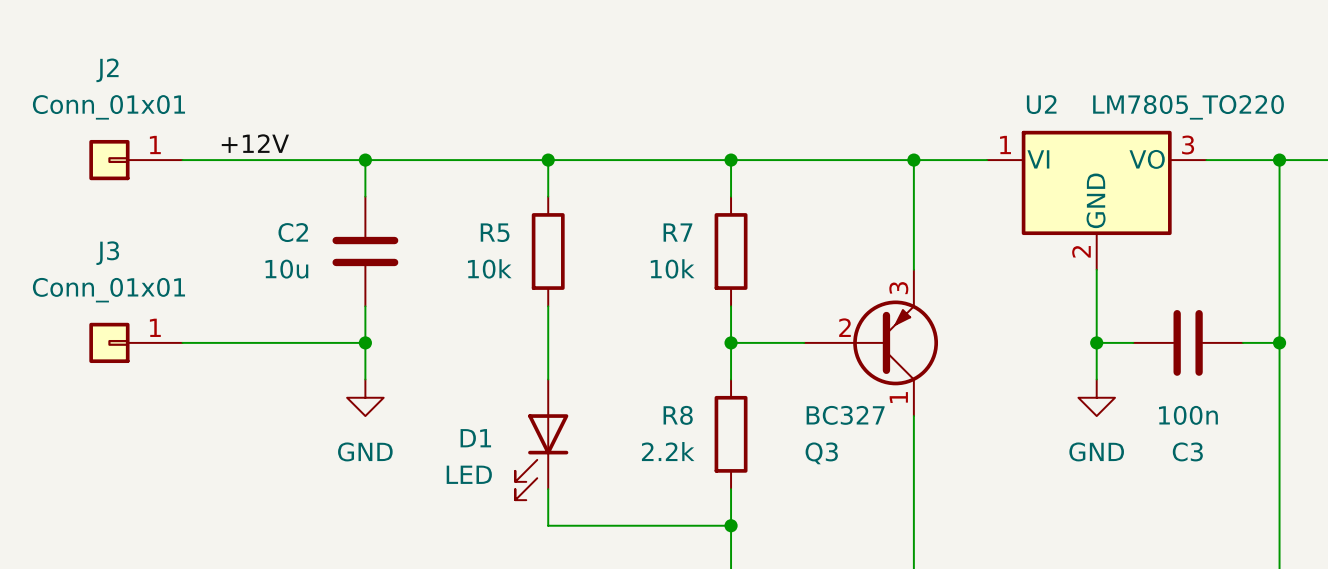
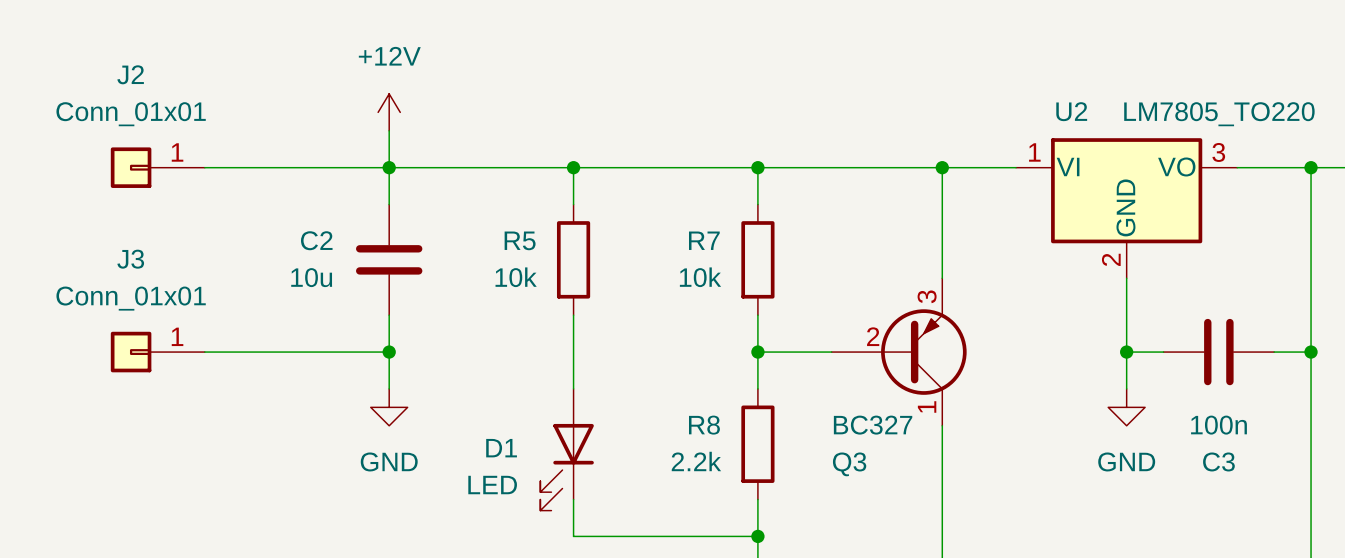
power symbol: none -> +12V (389, 112)
wire: none -> (389, 130) (389, 167)
label: +12V (255, 143) -> none

